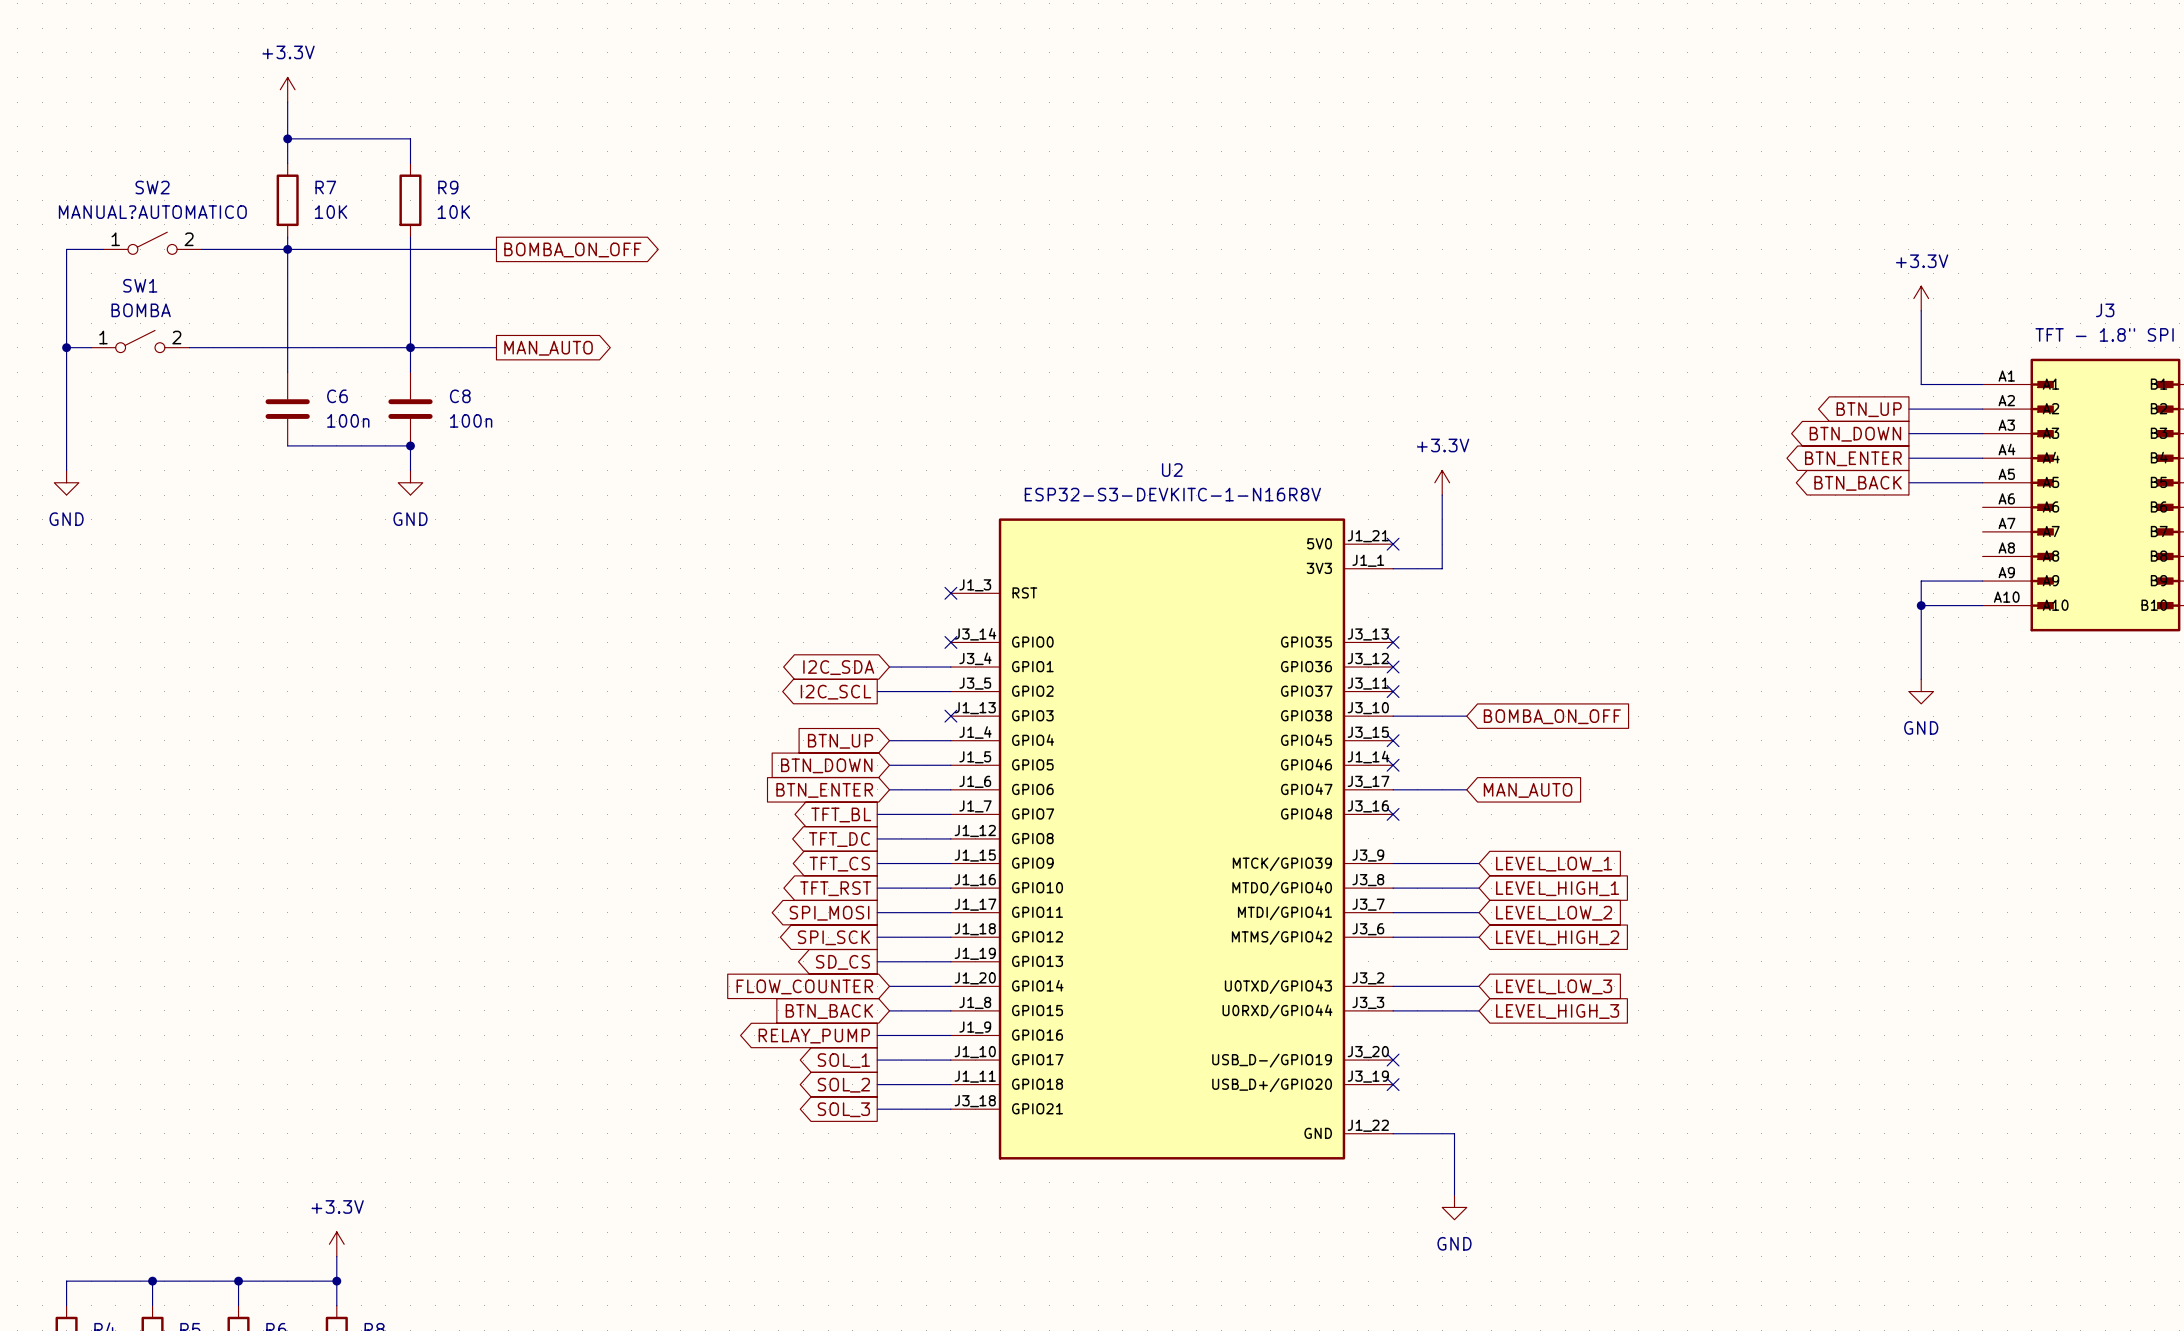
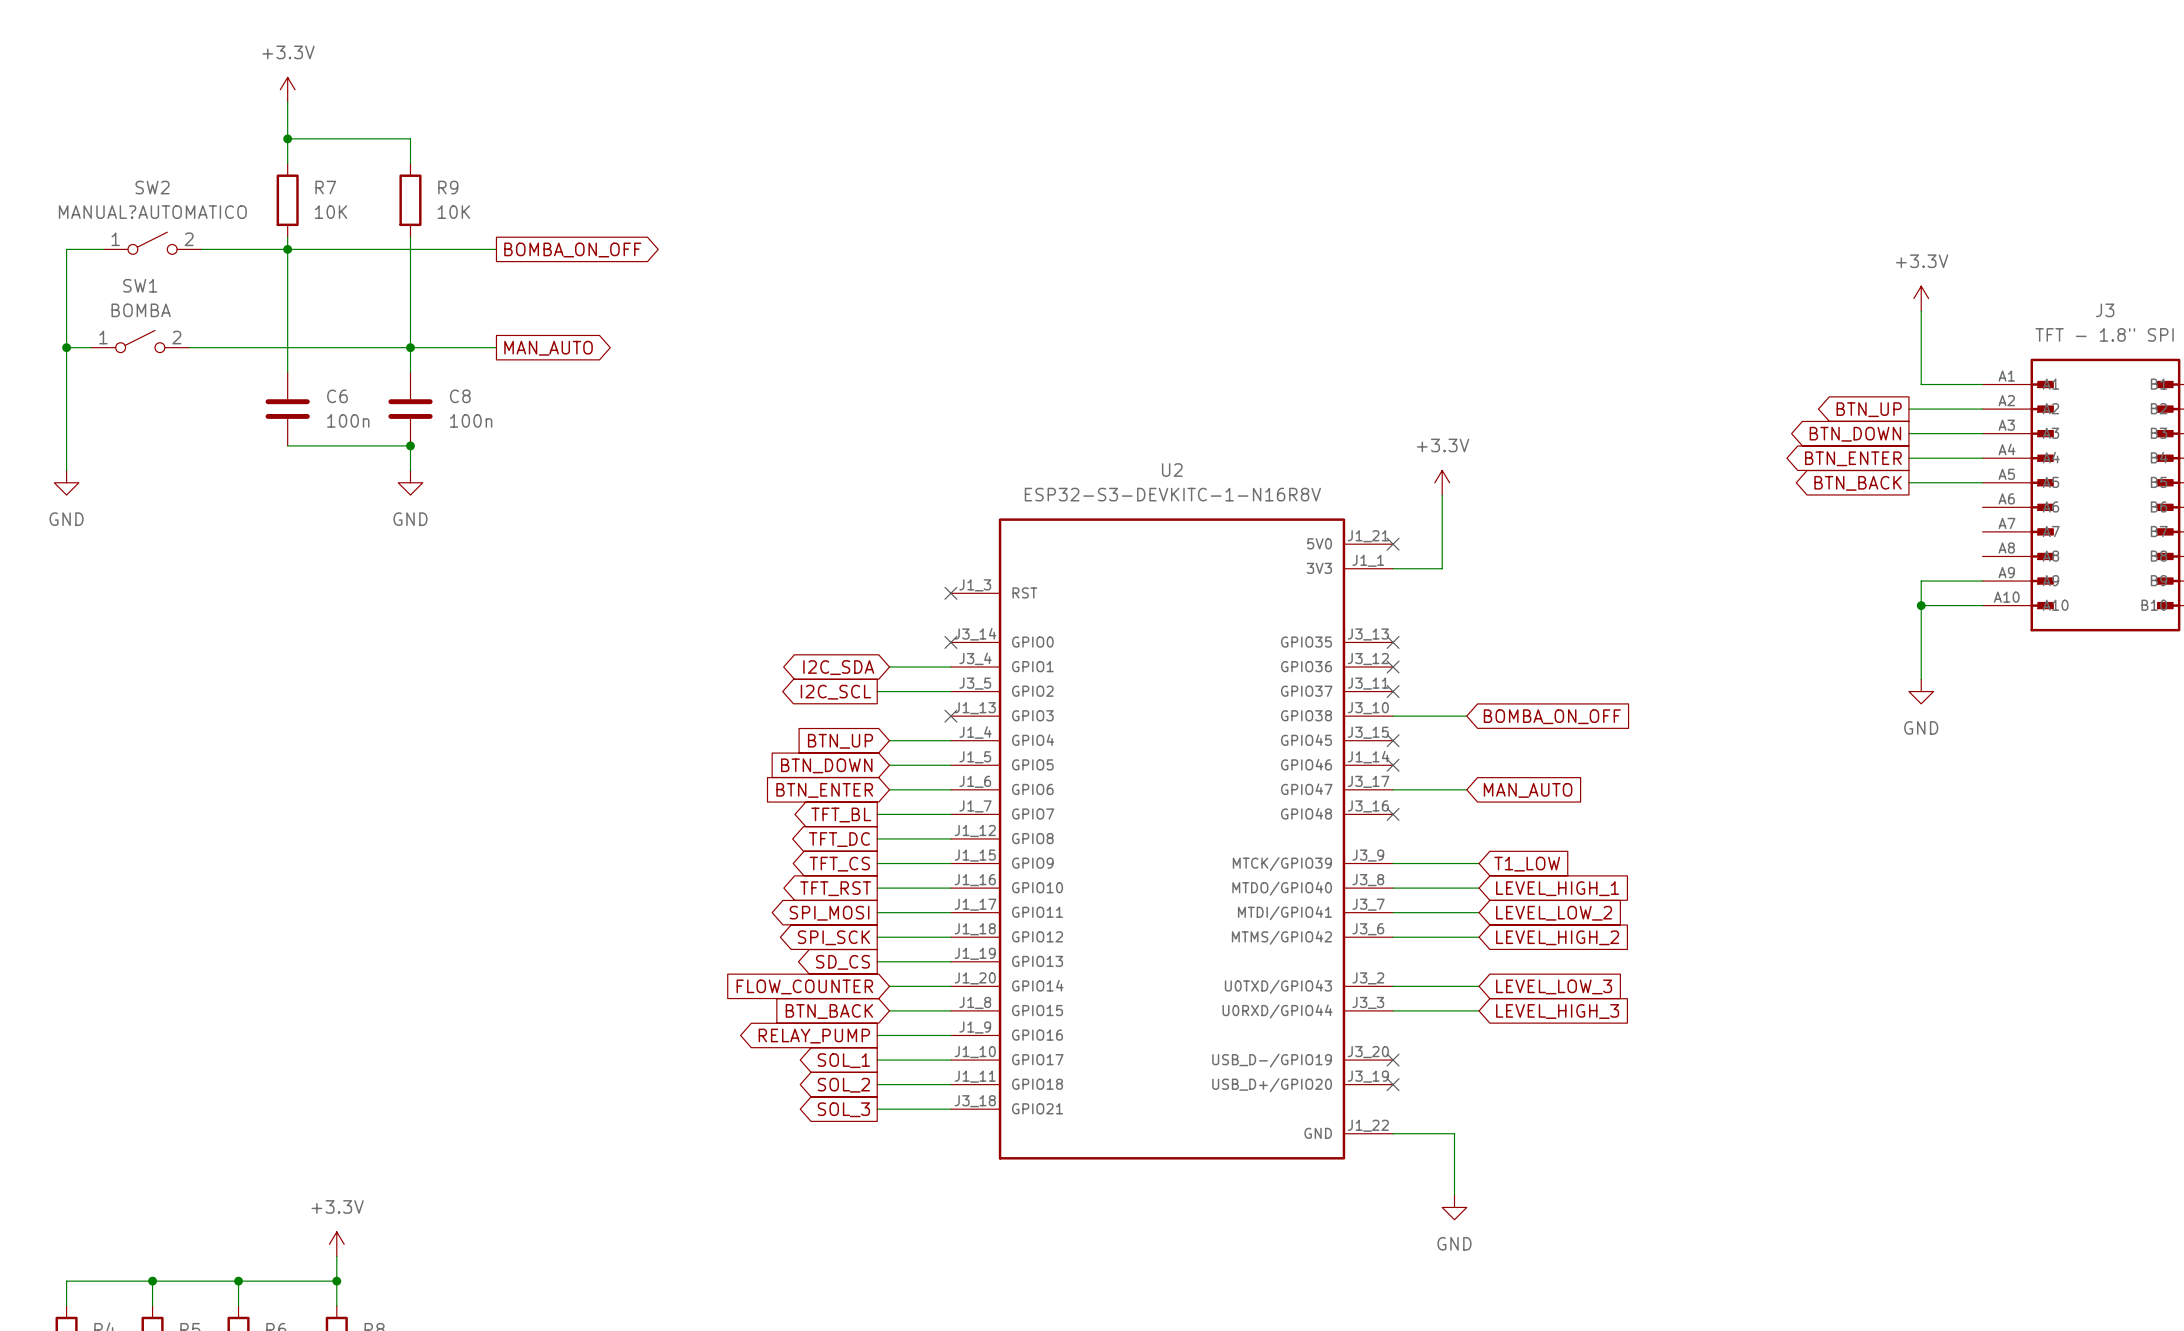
global label: LEVEL_LOW_1 (1554, 864) -> T1_LOW (1527, 864)

